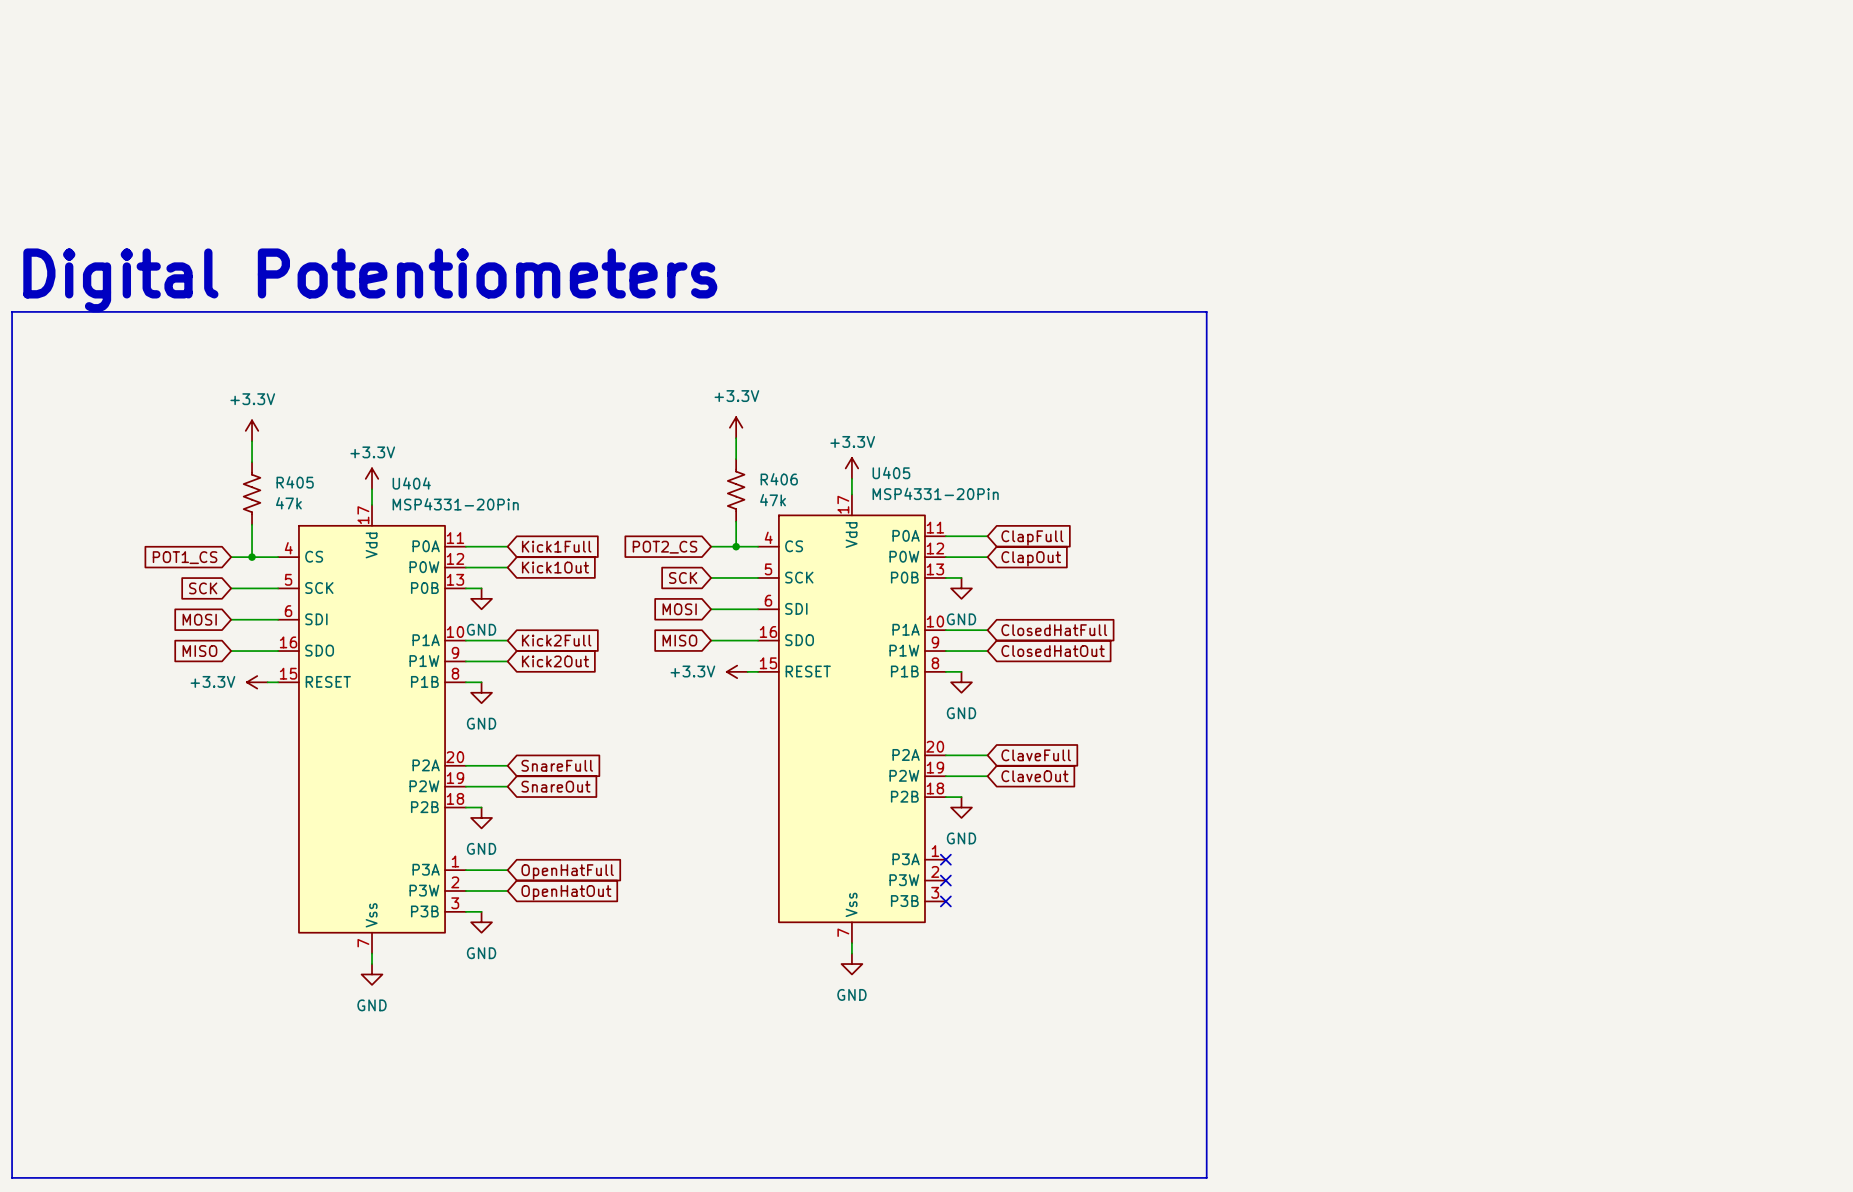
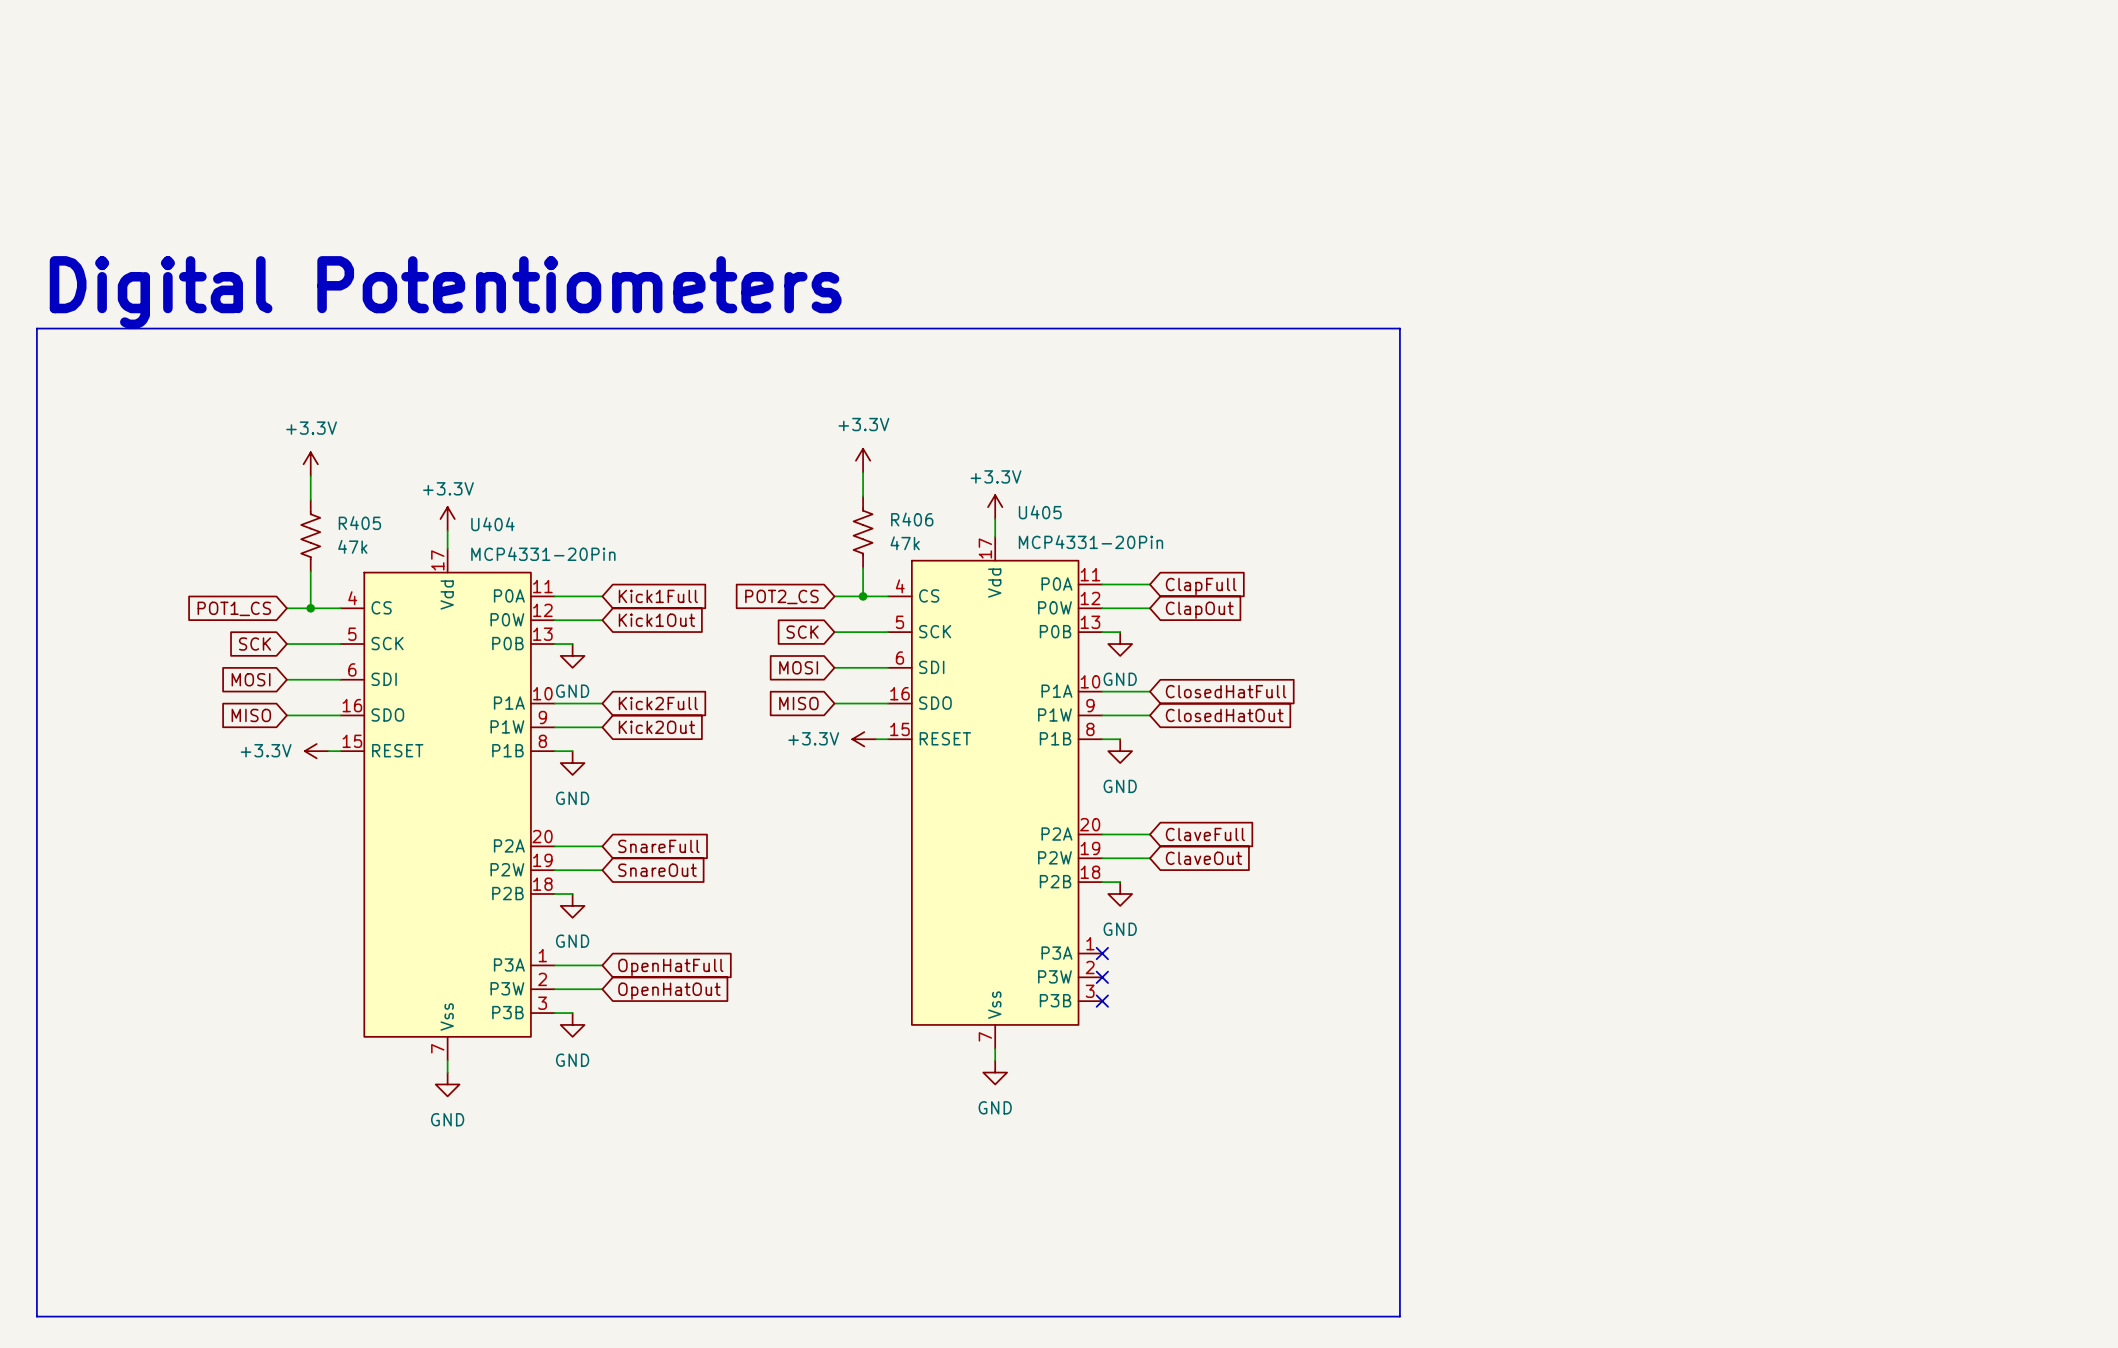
U405 value: MSP4331-20Pin (935, 493) -> MCP4331-20Pin (1090, 542)
U404 value: MSP4331-20Pin (455, 504) -> MCP4331-20Pin (543, 554)

